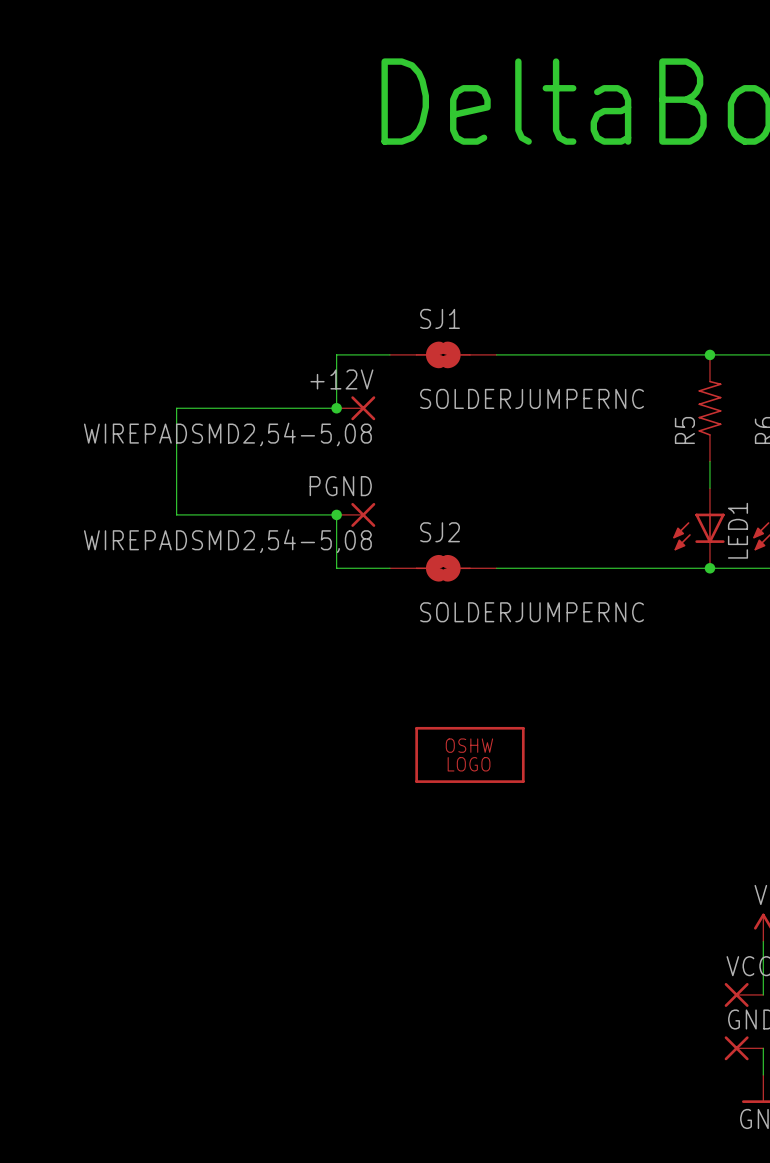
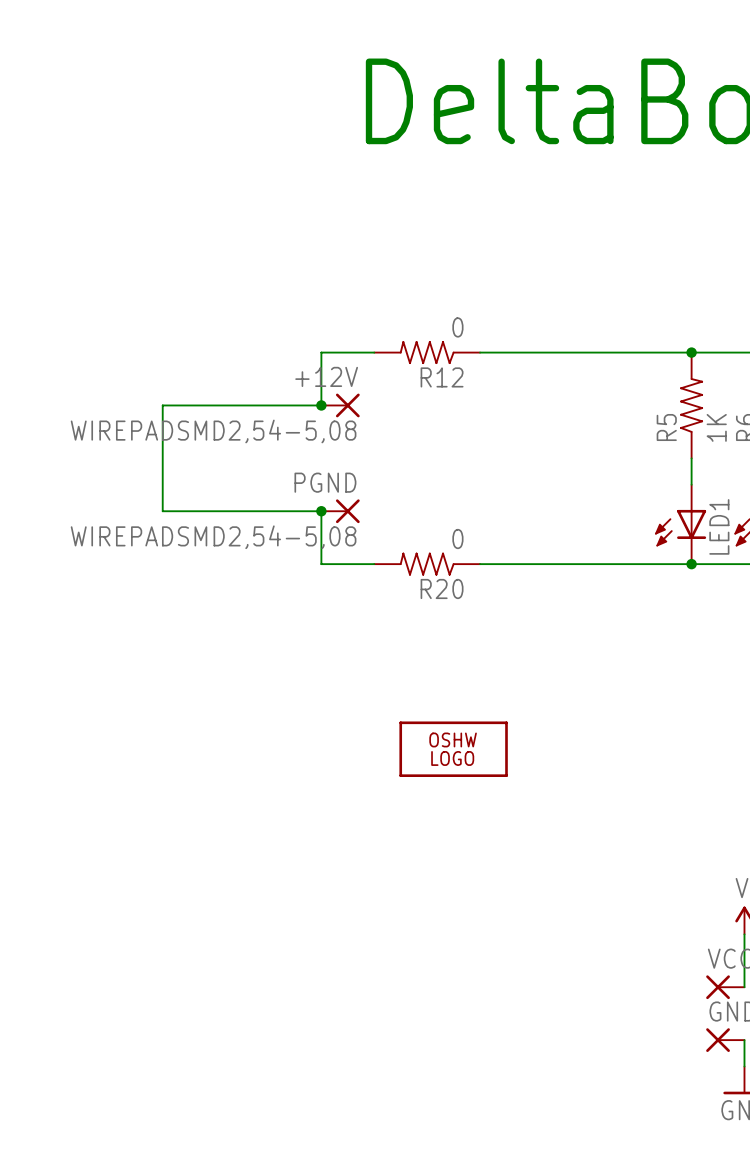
SJ1: SOLDERJUMPERNC (443, 354) -> none
R12: none -> 0 (427, 352)
R5 value: none -> 1K (716, 427)
SJ2: SOLDERJUMPERNC (443, 568) -> none
R20: none -> 0 (427, 564)

